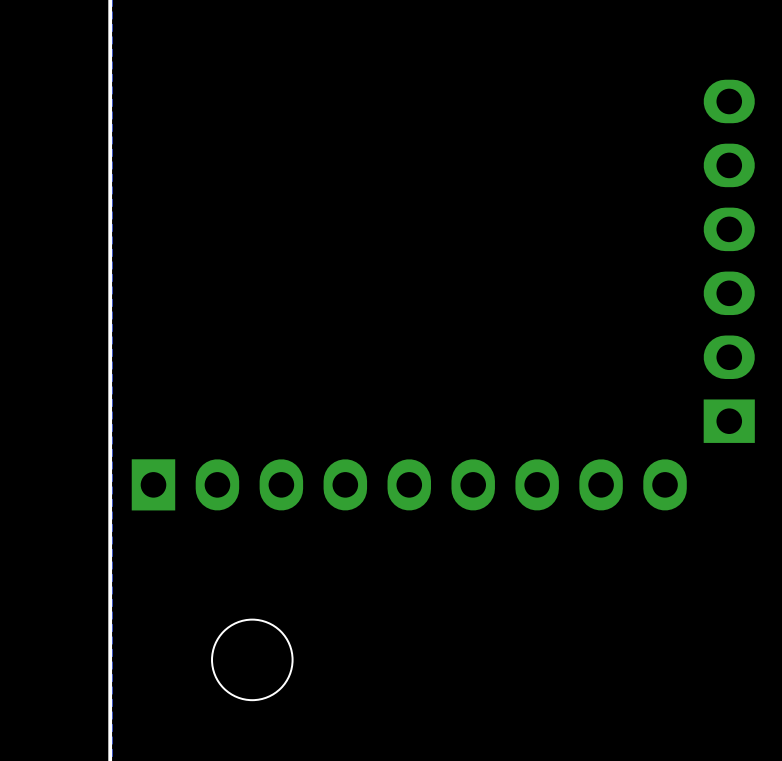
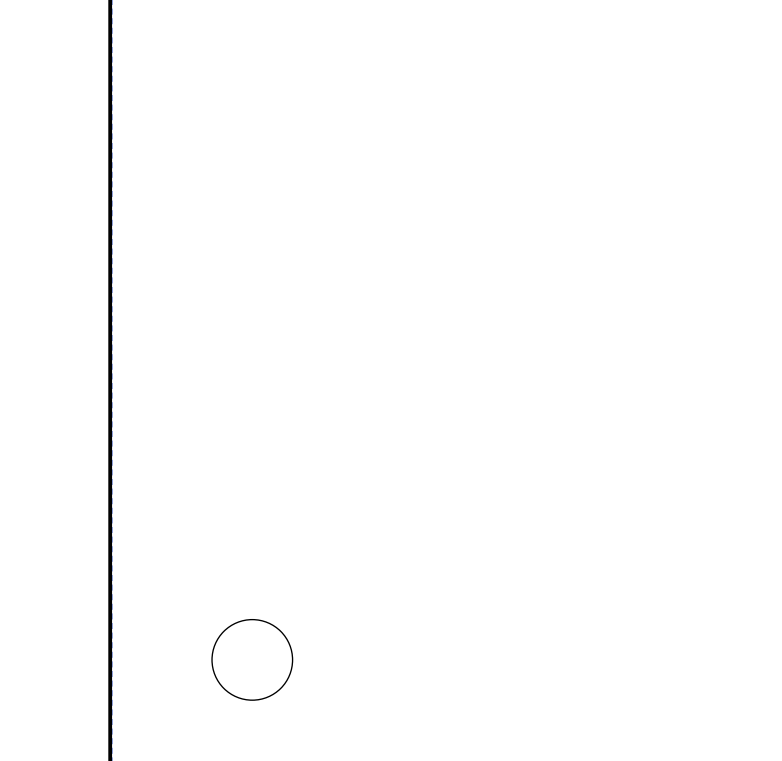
part: (443, 295) -> none

